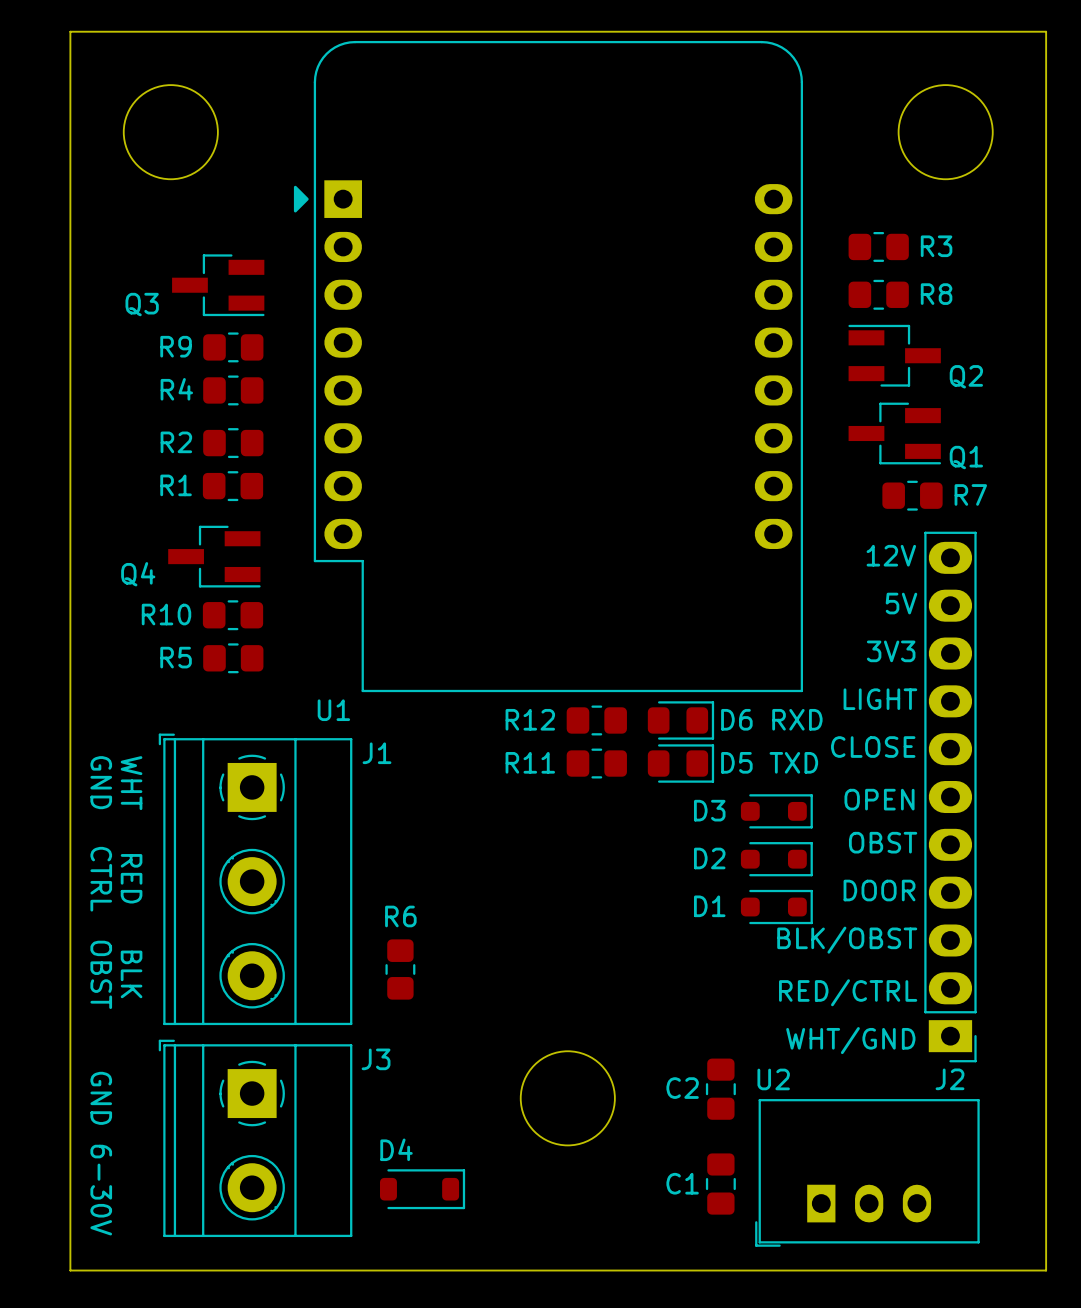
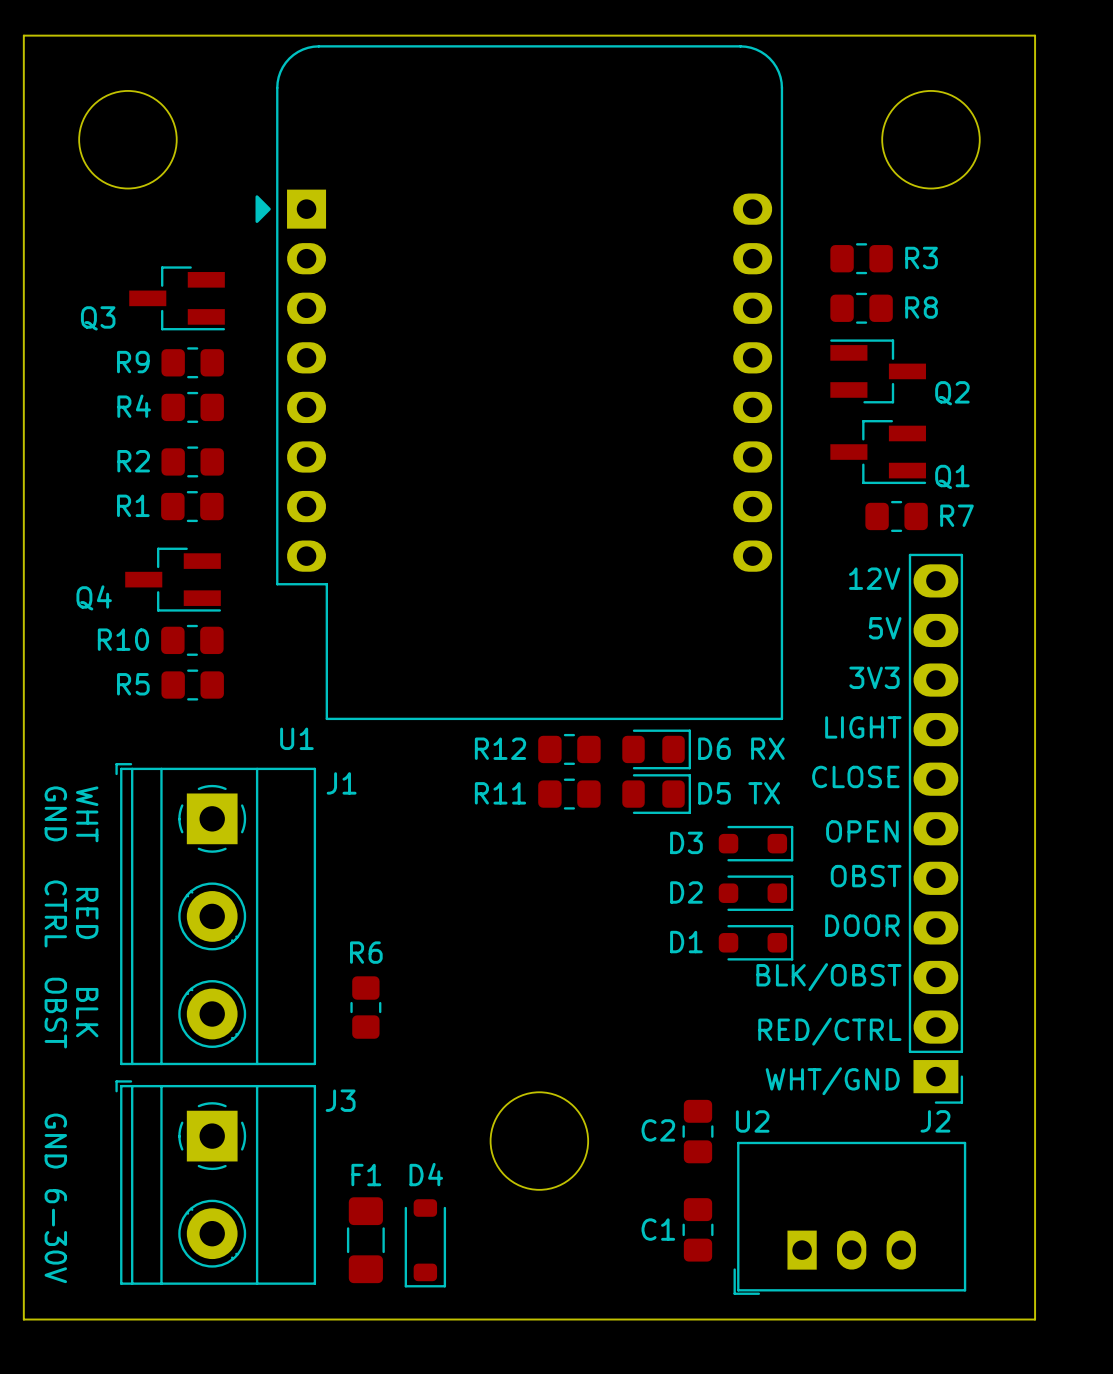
D6 RXD name: D6 RXD (771, 719) -> D6 RX (741, 748)
D5 TXD name: D5 TXD (769, 762) -> D5 TX (739, 793)
D4 name position: D4 (396, 1149) -> D4 (426, 1174)
D4 rotation: 0° (422, 1189) -> 90° clockwise (425, 1243)
F1: none -> (365, 1240)

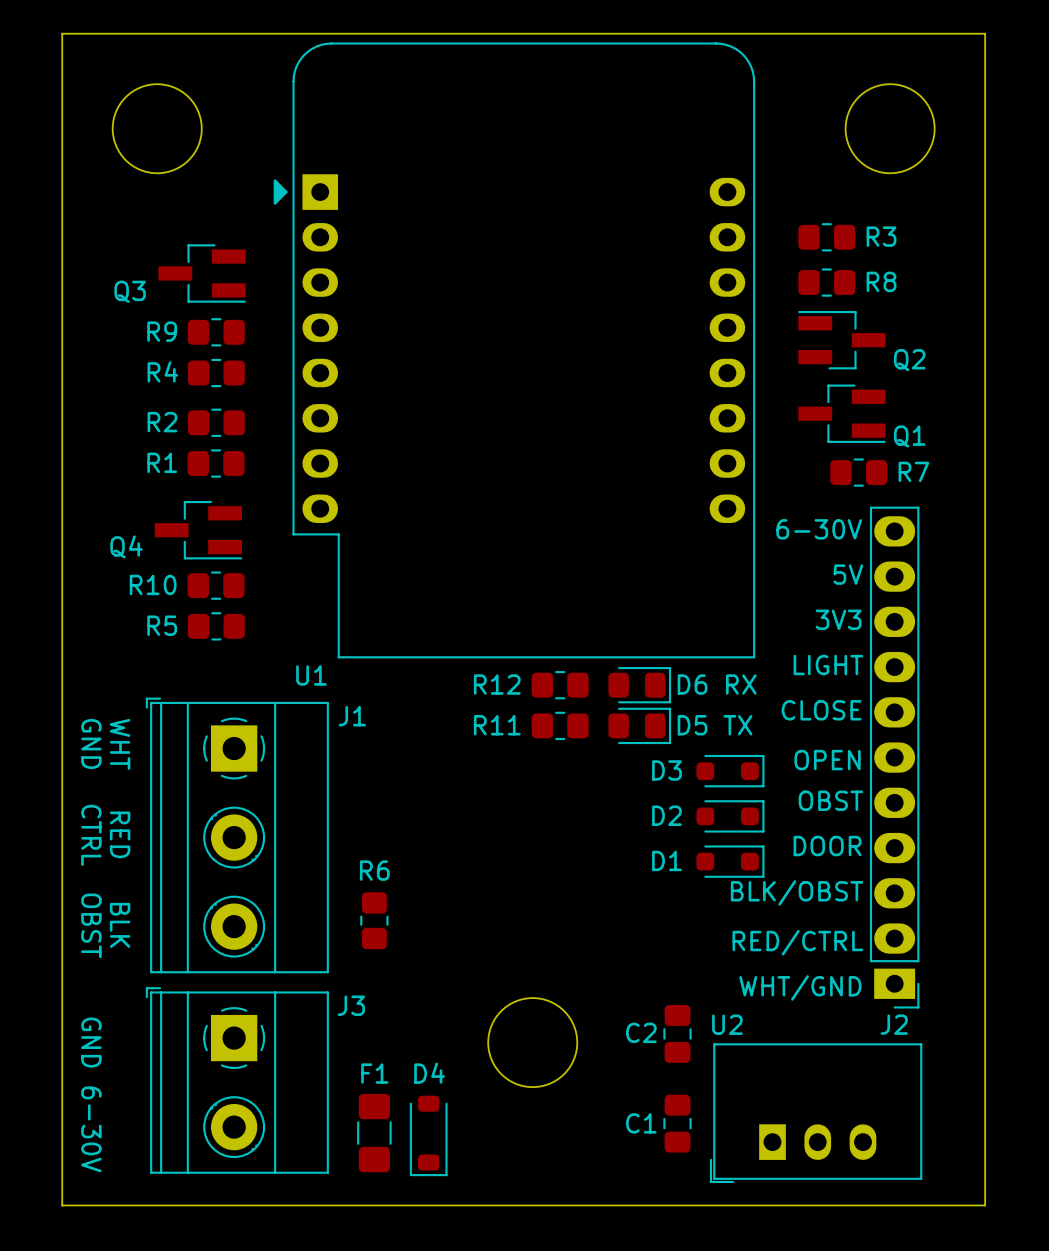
text: none -> 6-30V (819, 529)
text: 12V (874, 578) -> none

